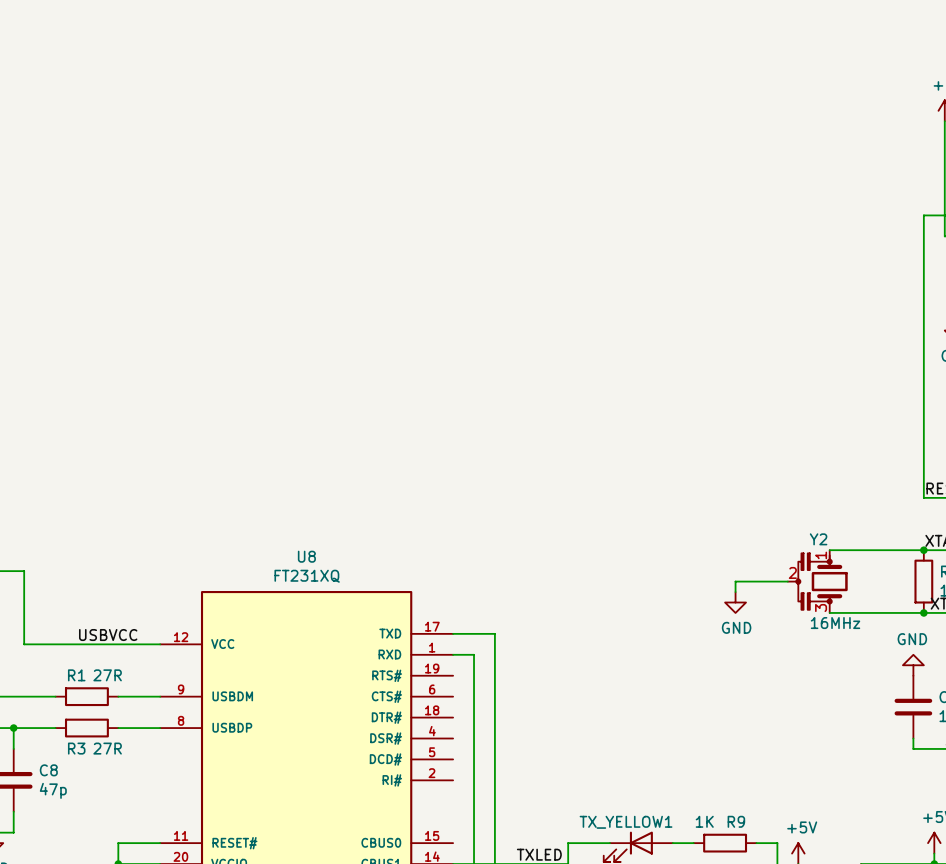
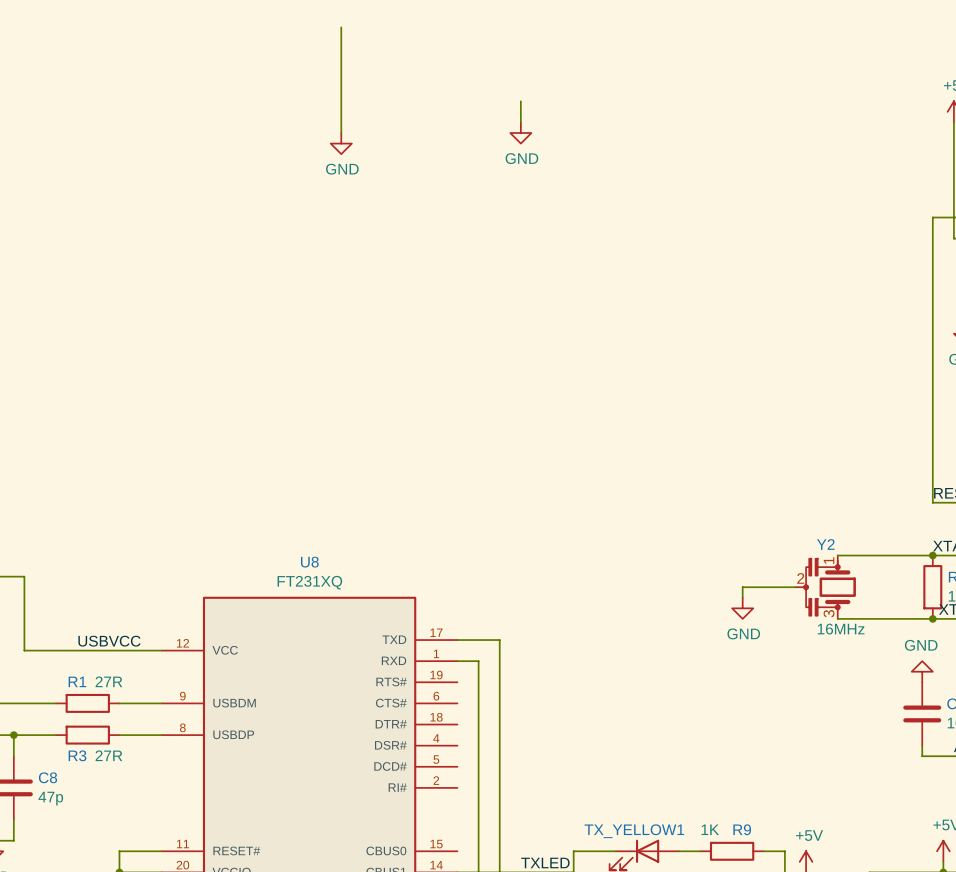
wire: none -> (341, 27) (341, 133)
wire: none -> (520, 101) (520, 122)
power symbol: none -> GND (520, 133)
power symbol: none -> GND (341, 143)

